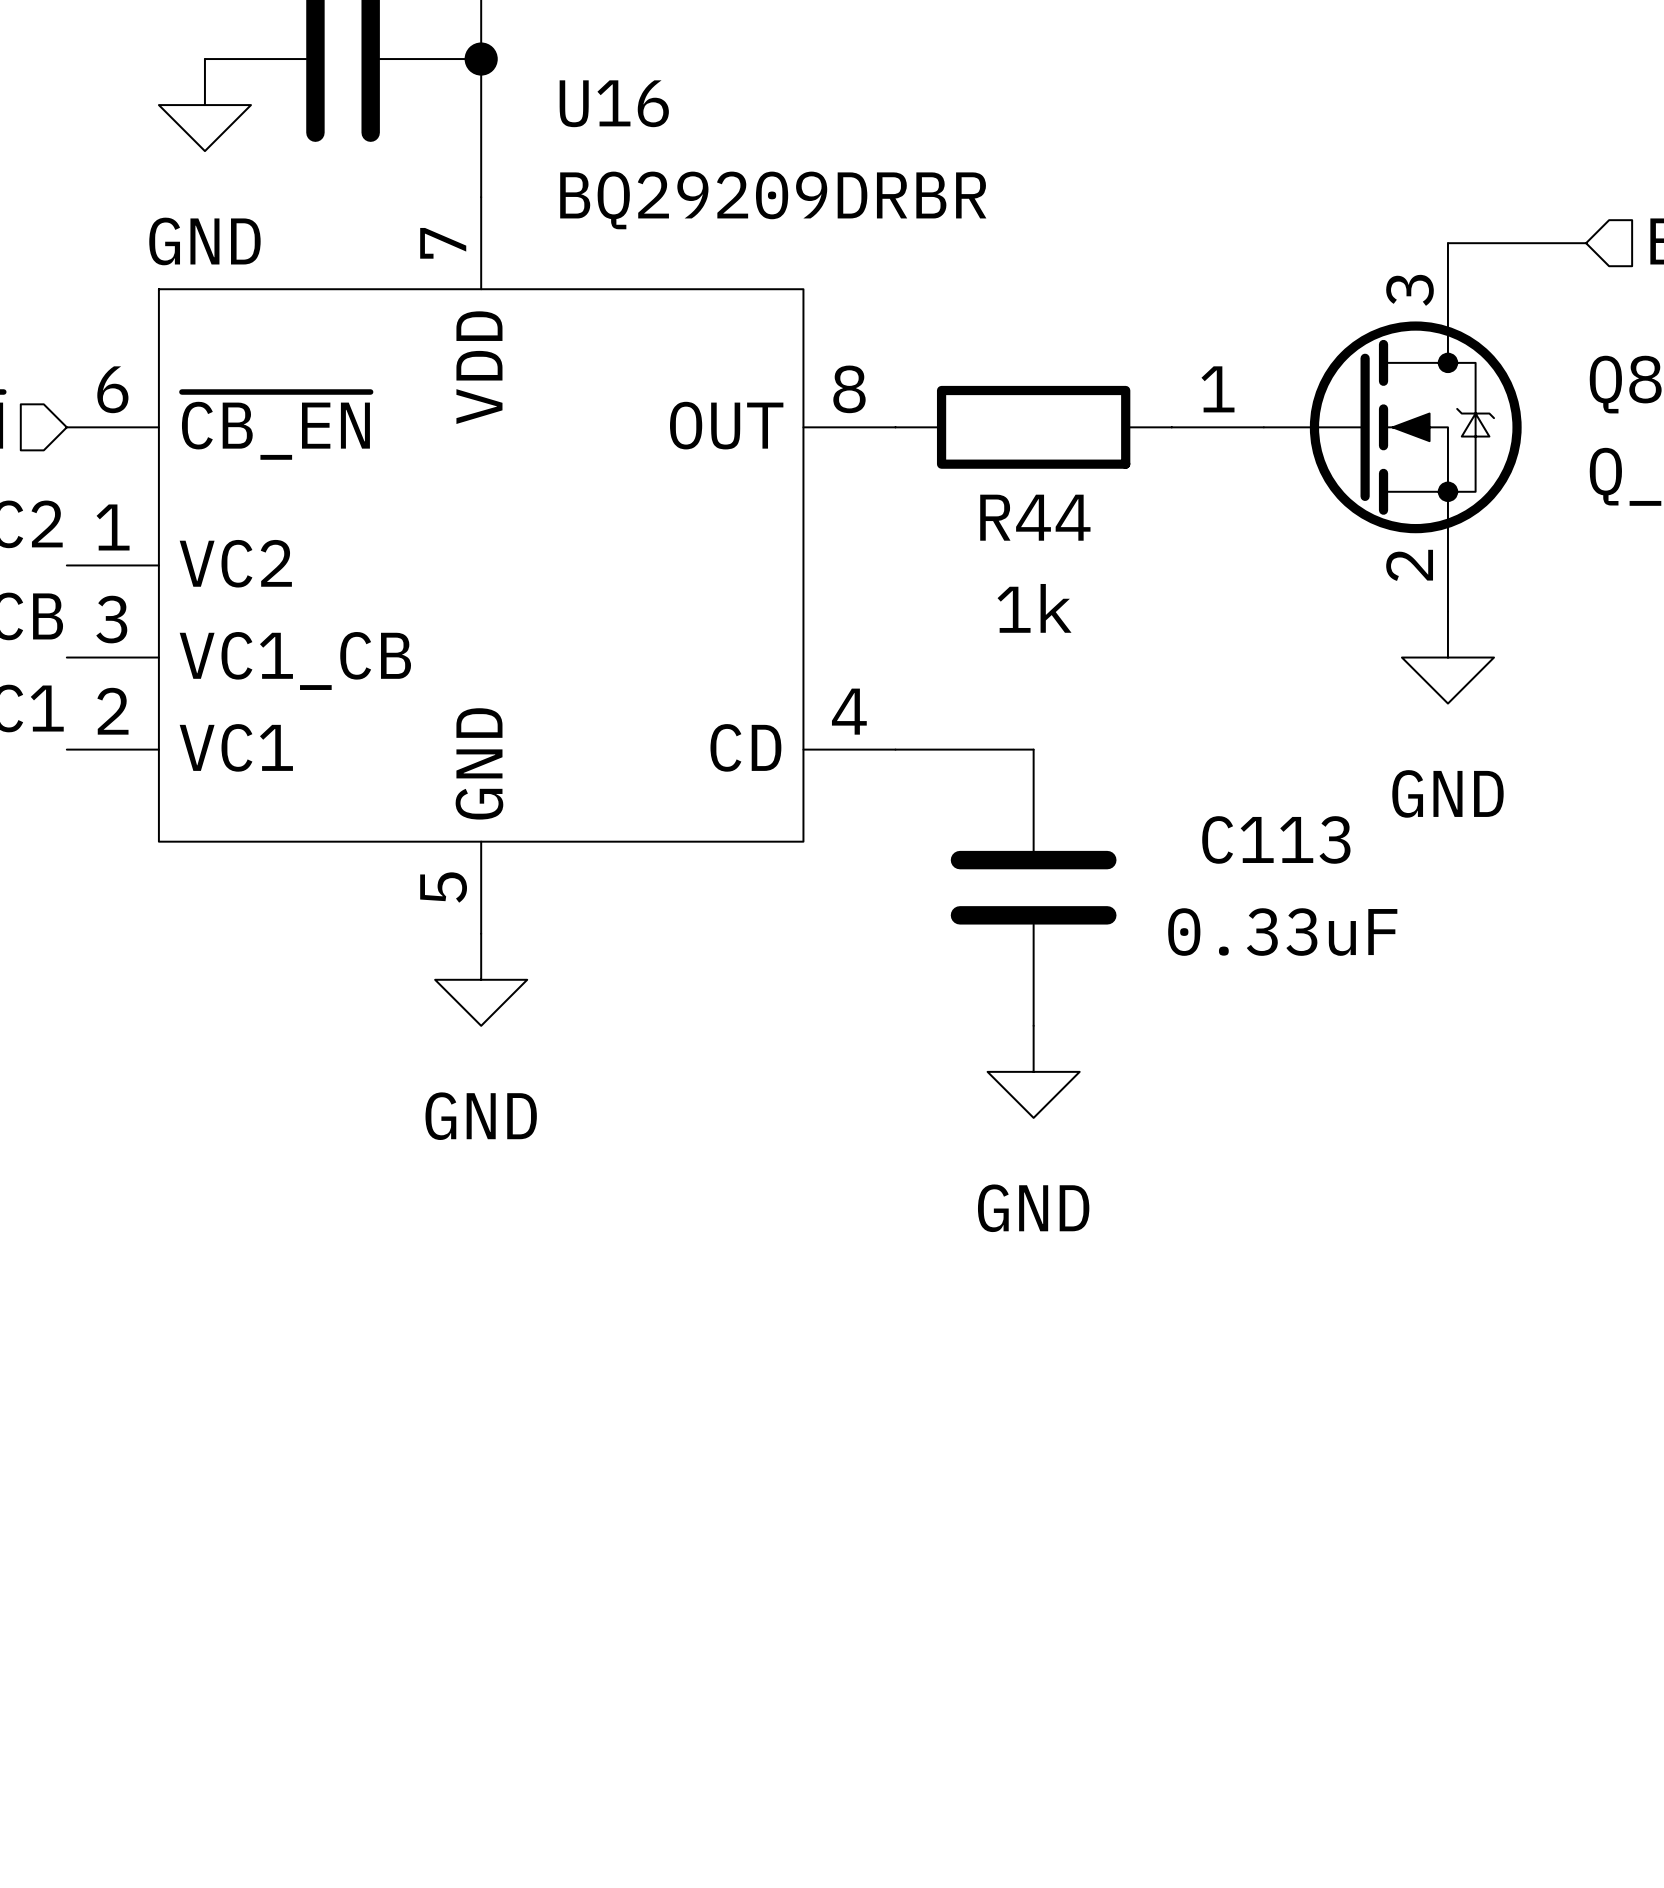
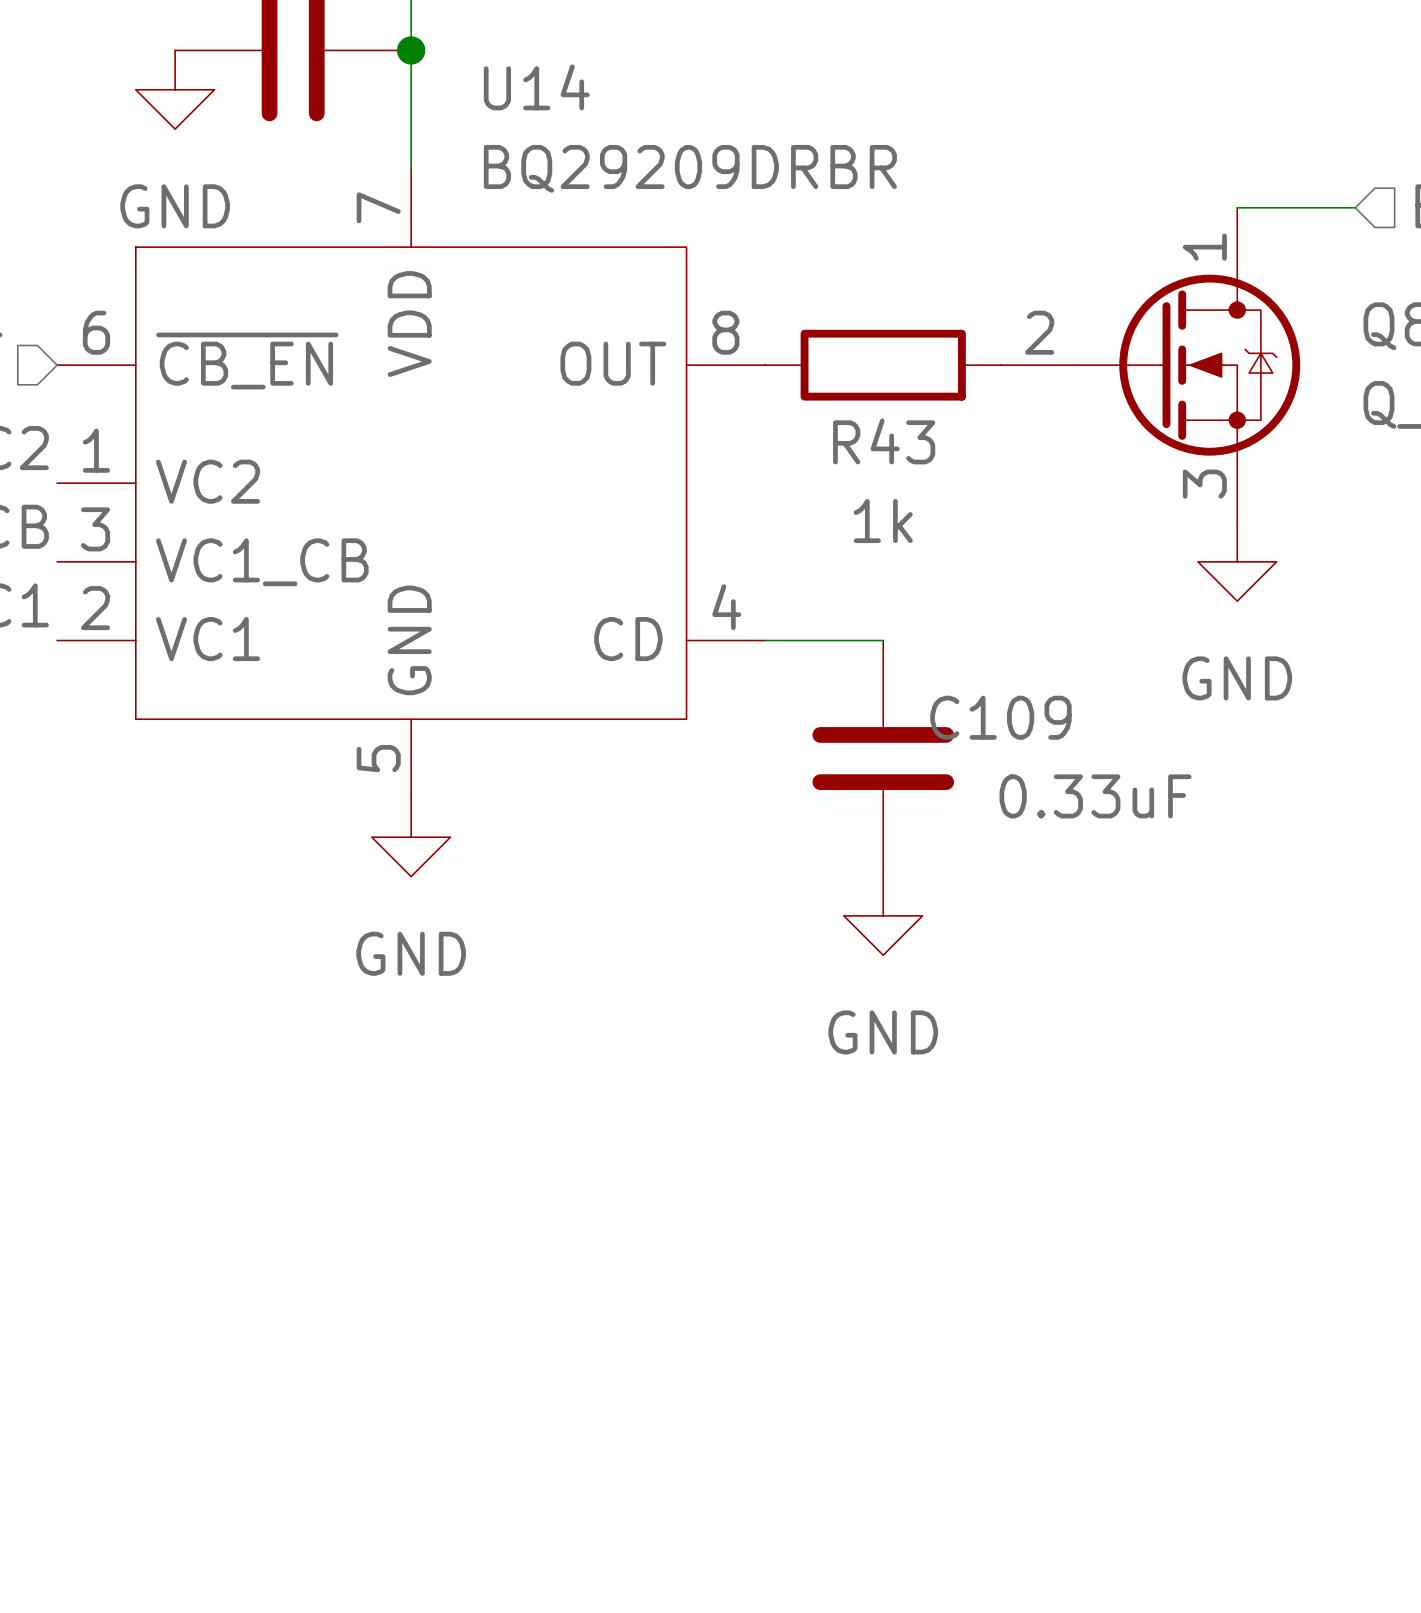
U16 name: U16 (614, 103) -> U14 (536, 87)
Q8 pin number: 3 (1410, 290) -> 1 (1204, 247)
Q8 pin number: 1 (1217, 389) -> 2 (1039, 332)
R44 name: R44 (1035, 517) -> R43 (884, 441)
Q8 pin number: 2 (1409, 565) -> 3 (1204, 484)
C113 name: C113 (1276, 839) -> C109 (1000, 717)

